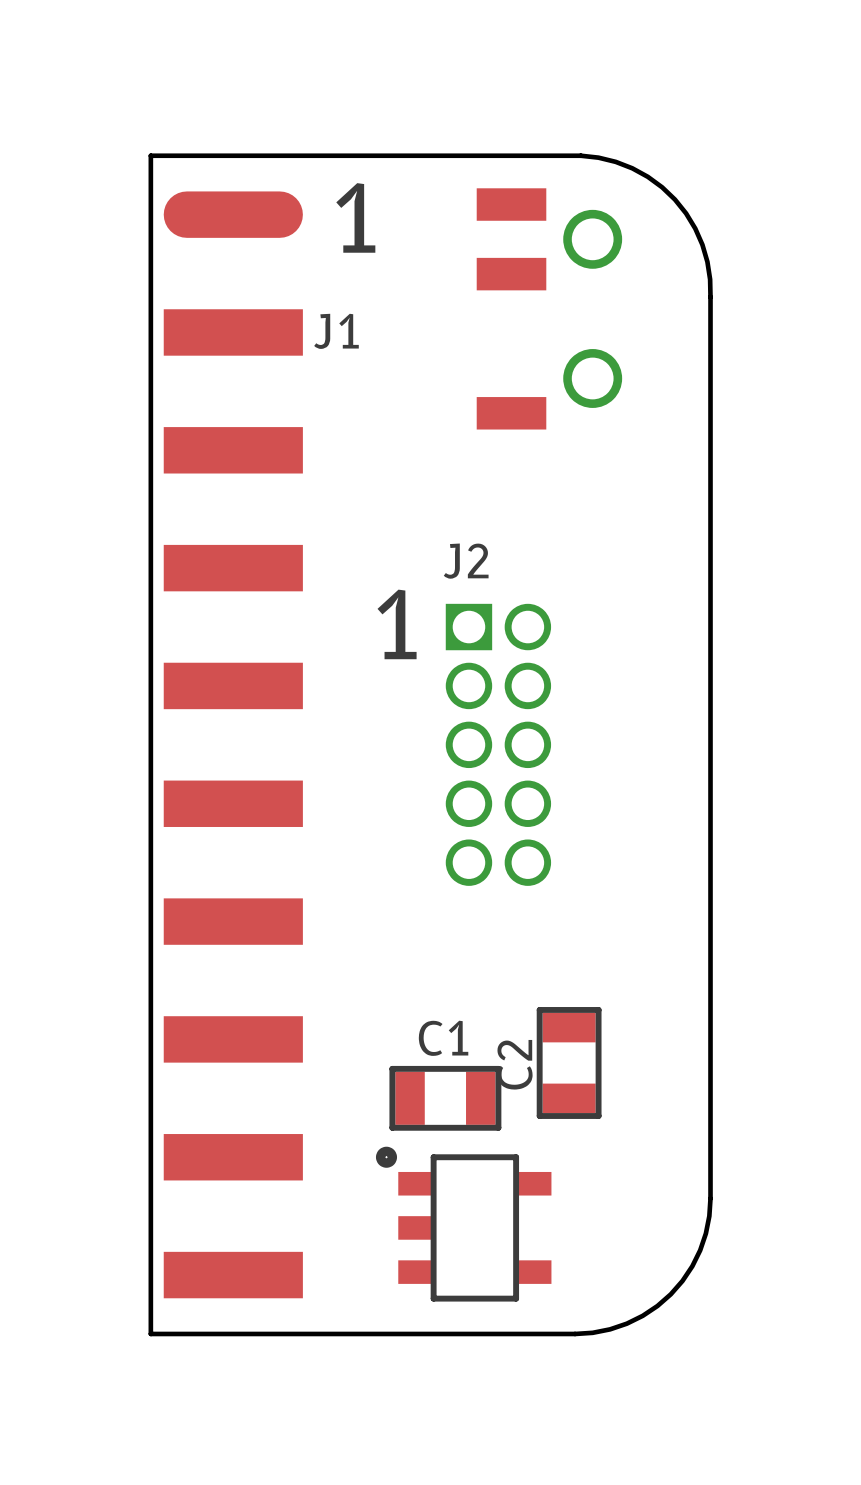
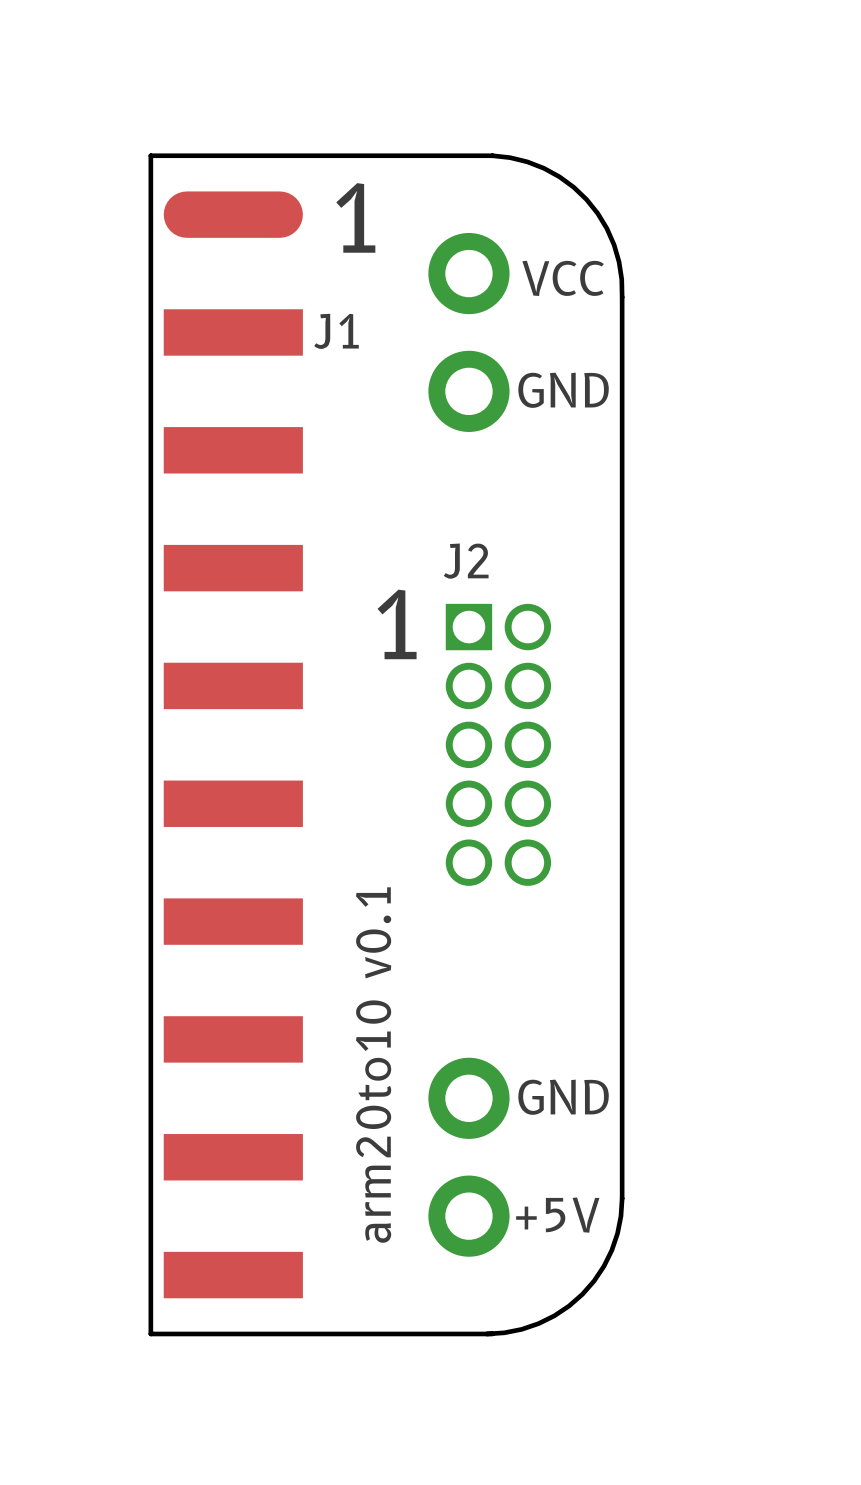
board edge: (492, 155) (580, 155) (598, 157) (632, 168) (647, 176) (674, 199) (695, 228) (707, 261) (710, 297) (710, 1198) (705, 1233) (692, 1266) (670, 1294) (642, 1315) (626, 1323) (592, 1332) (492, 1333) -> (492, 155) (510, 157) (543, 168) (573, 187) (597, 213) (606, 228) (614, 244) (621, 279) (622, 1198) (620, 1216) (611, 1250) (603, 1266) (582, 1294) (554, 1315) (538, 1323) (504, 1332) (486, 1333)
part: none -> VCC (468, 273)
part: (549, 308) -> none
part: none -> GND (468, 391)
C2: (569, 1062) -> none
text: none -> arm20to10 v0.1 (373, 1065)
C1: (445, 1098) -> none
part: none -> GND (468, 1098)
drawing: [375, 1146, 398, 1168] -> none
part footprint: [398, 1154, 552, 1302] -> [428, 1175, 510, 1257]
part value: none -> +5V (557, 1215)

